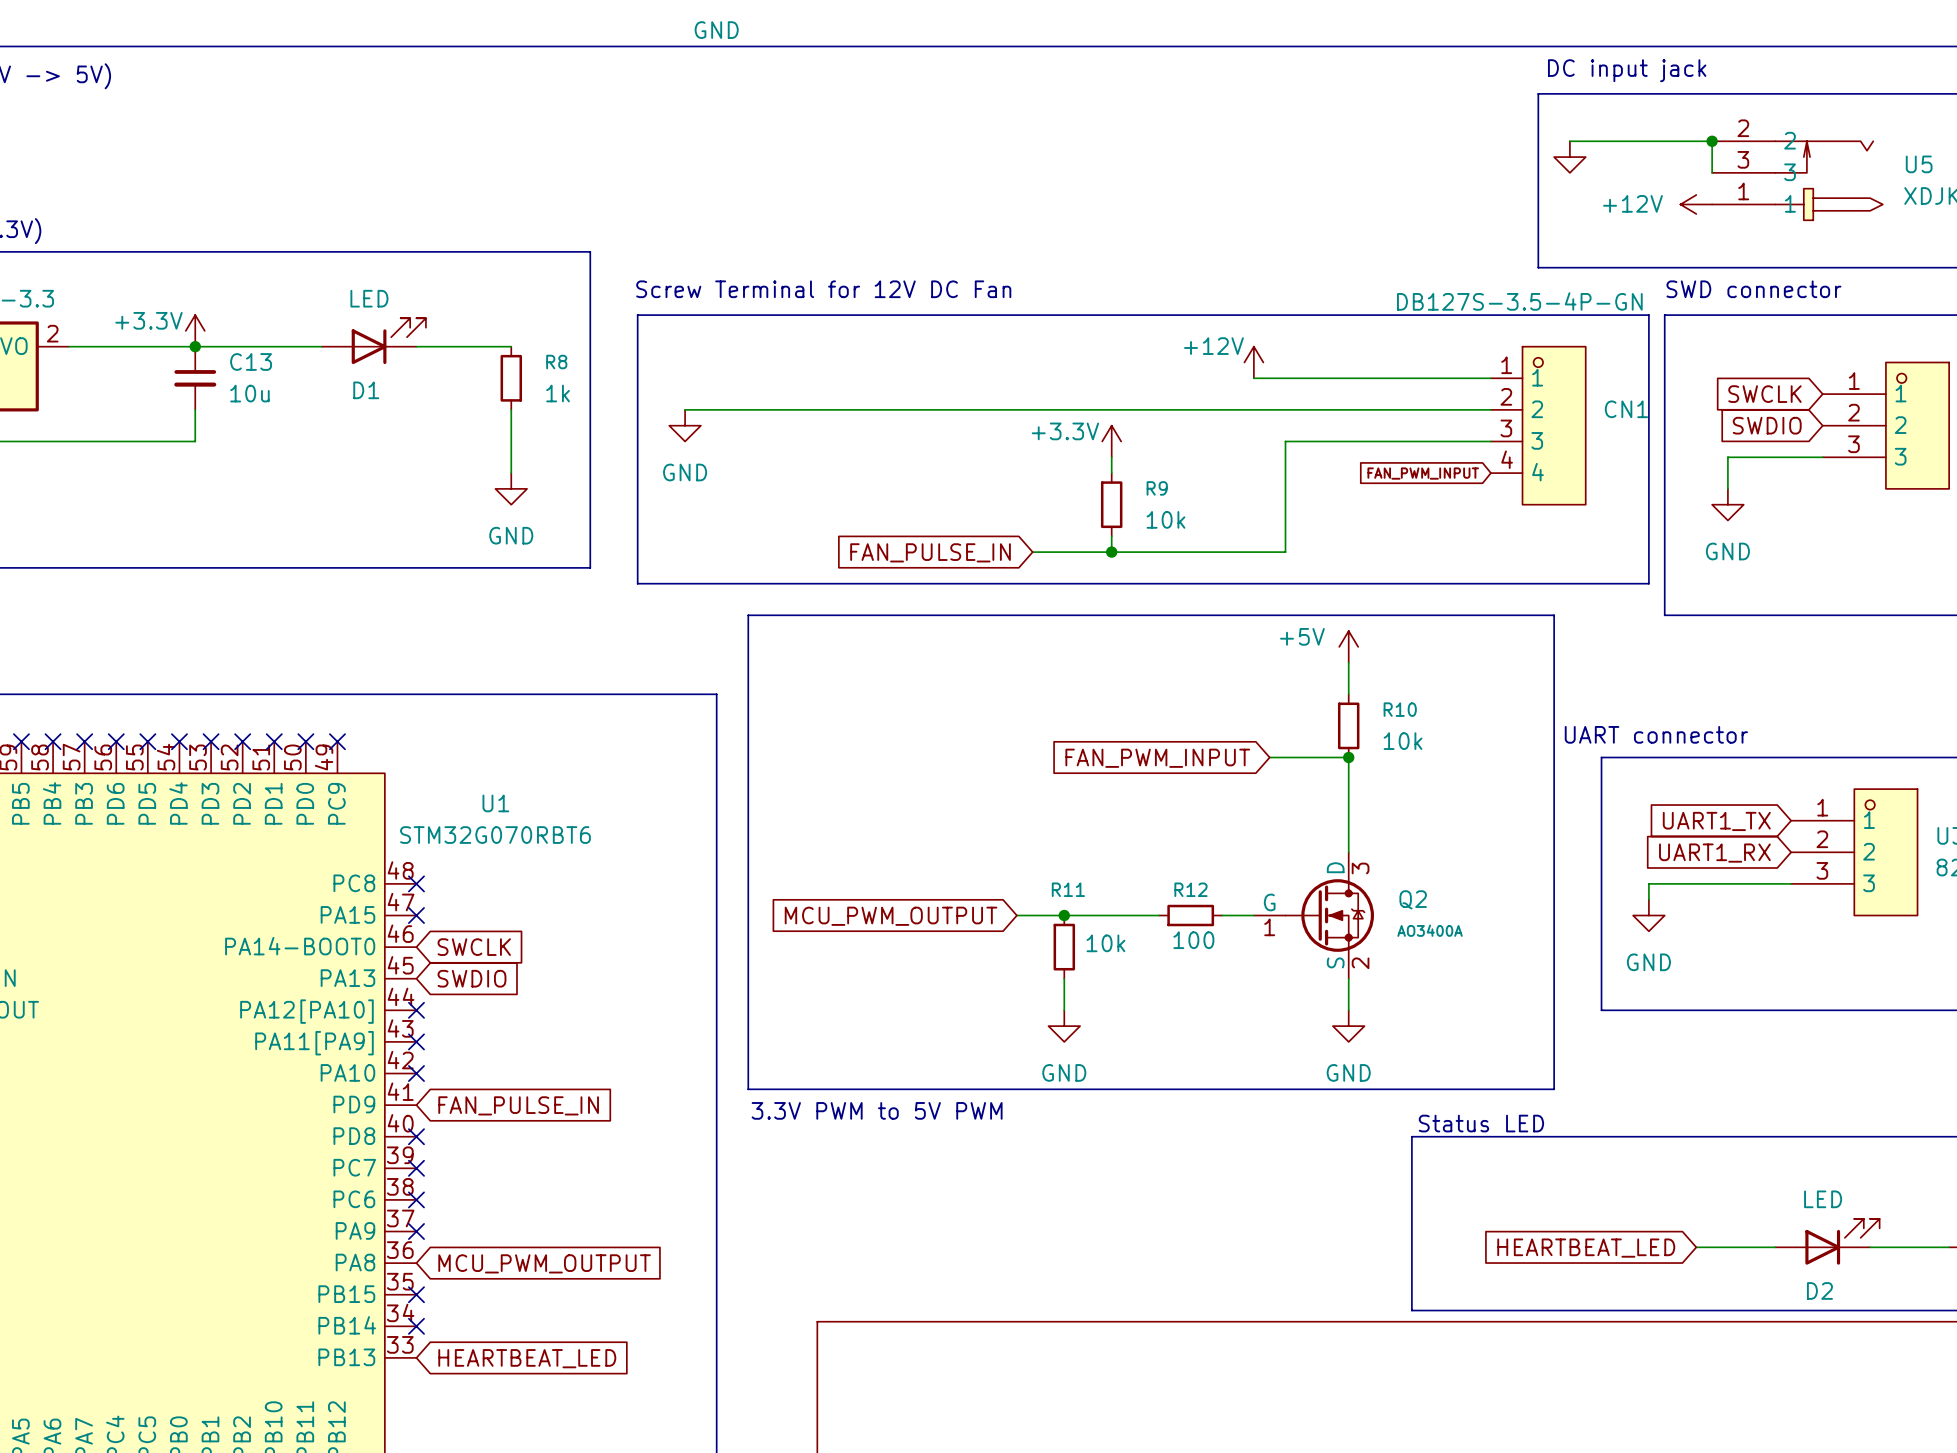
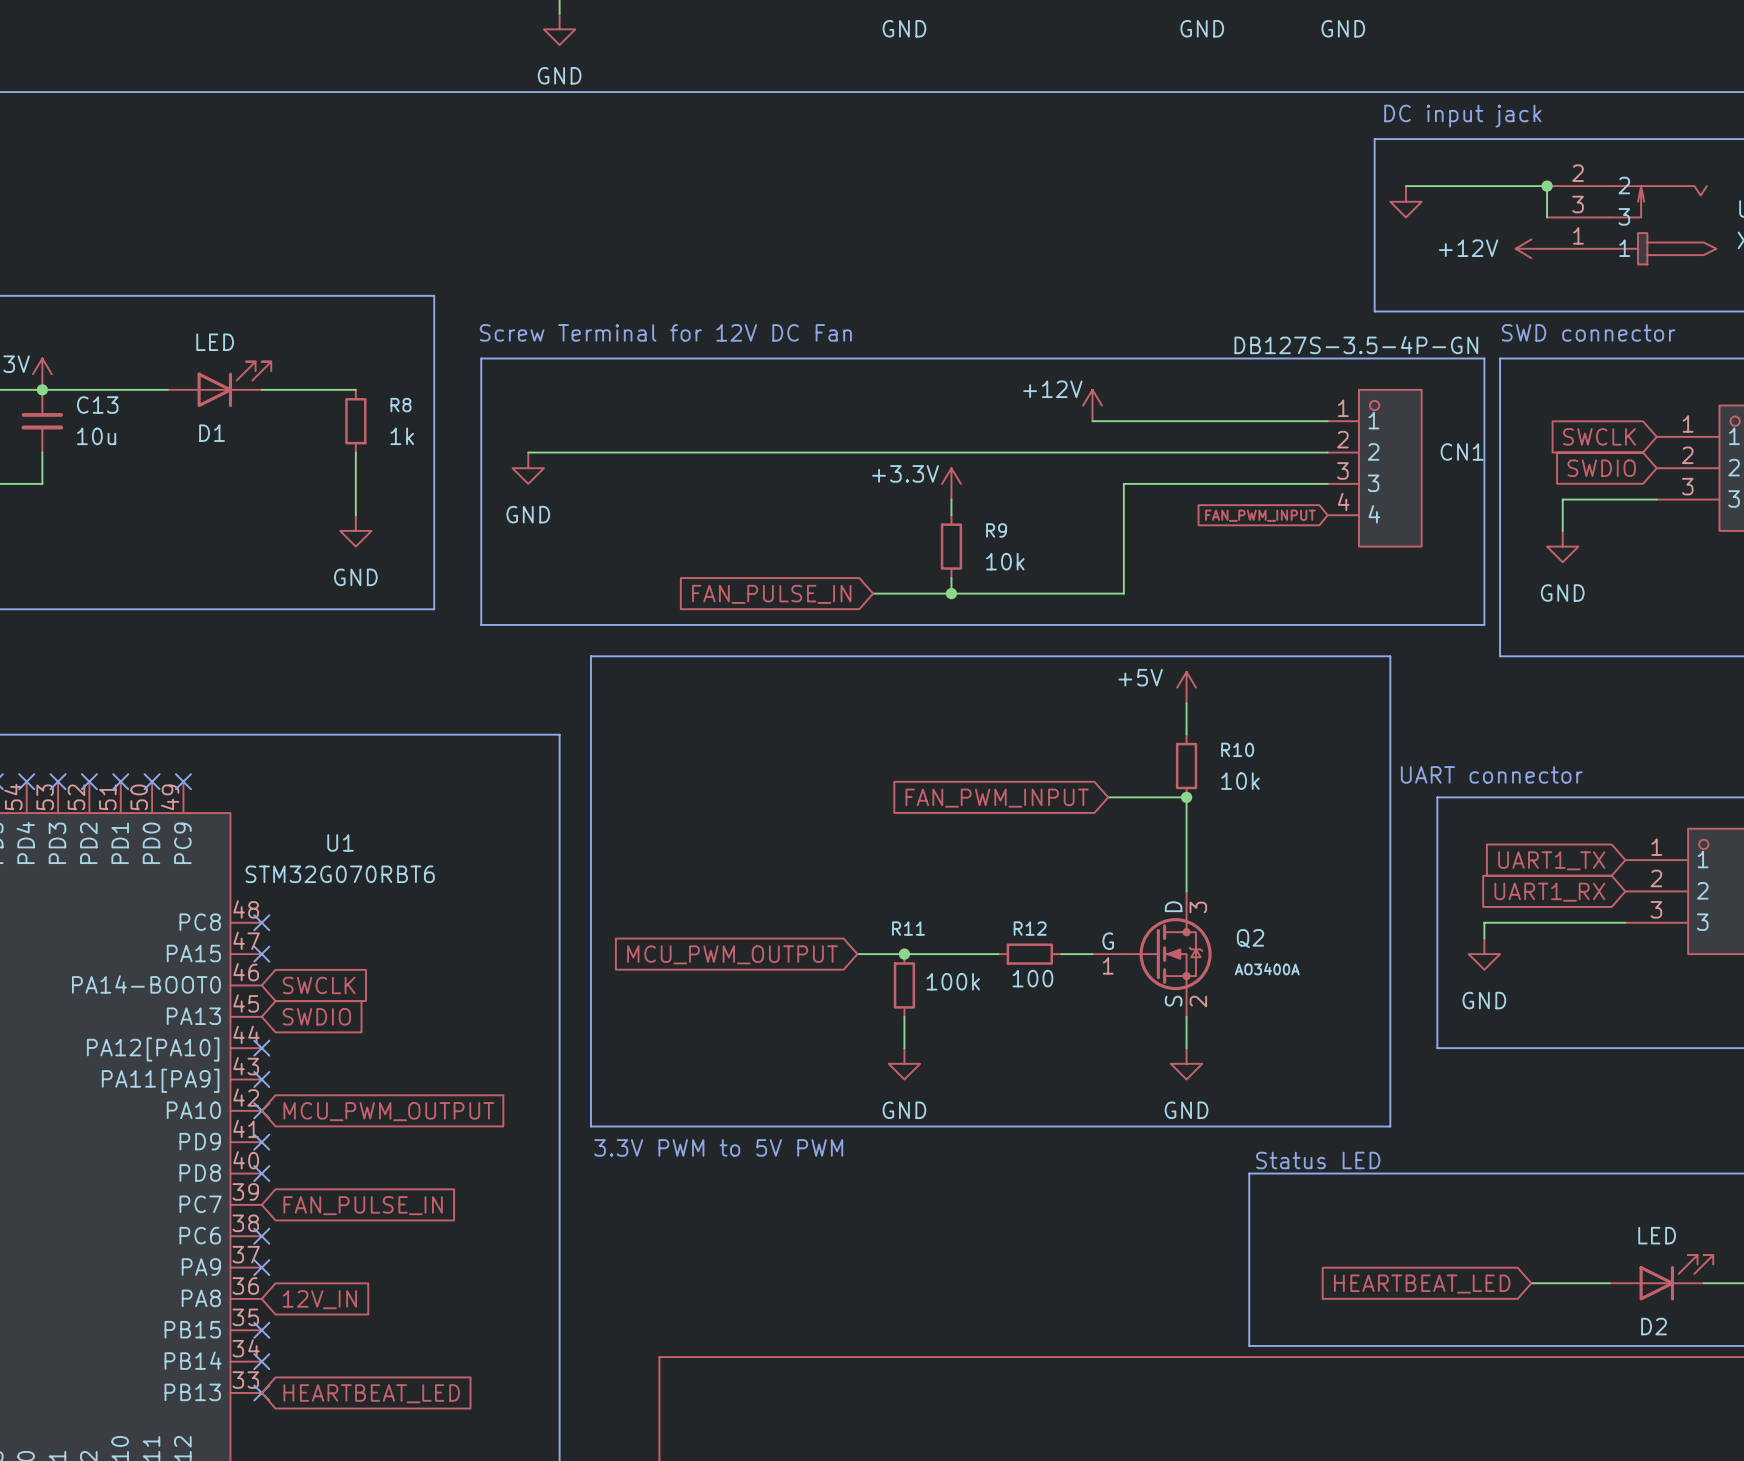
R11 value: 10k (1105, 943) -> 100k (953, 981)
global label: none -> MCU_PWM_OUTPUT (388, 1111)
global label position: FAN_PULSE_IN (518, 1105) -> FAN_PULSE_IN (363, 1205)
no-connect mark position: (416, 1168) -> (261, 1142)
global label: MCU_PWM_OUTPUT (544, 1263) -> 12V_IN (319, 1299)
no-connect mark: none -> (261, 1392)

